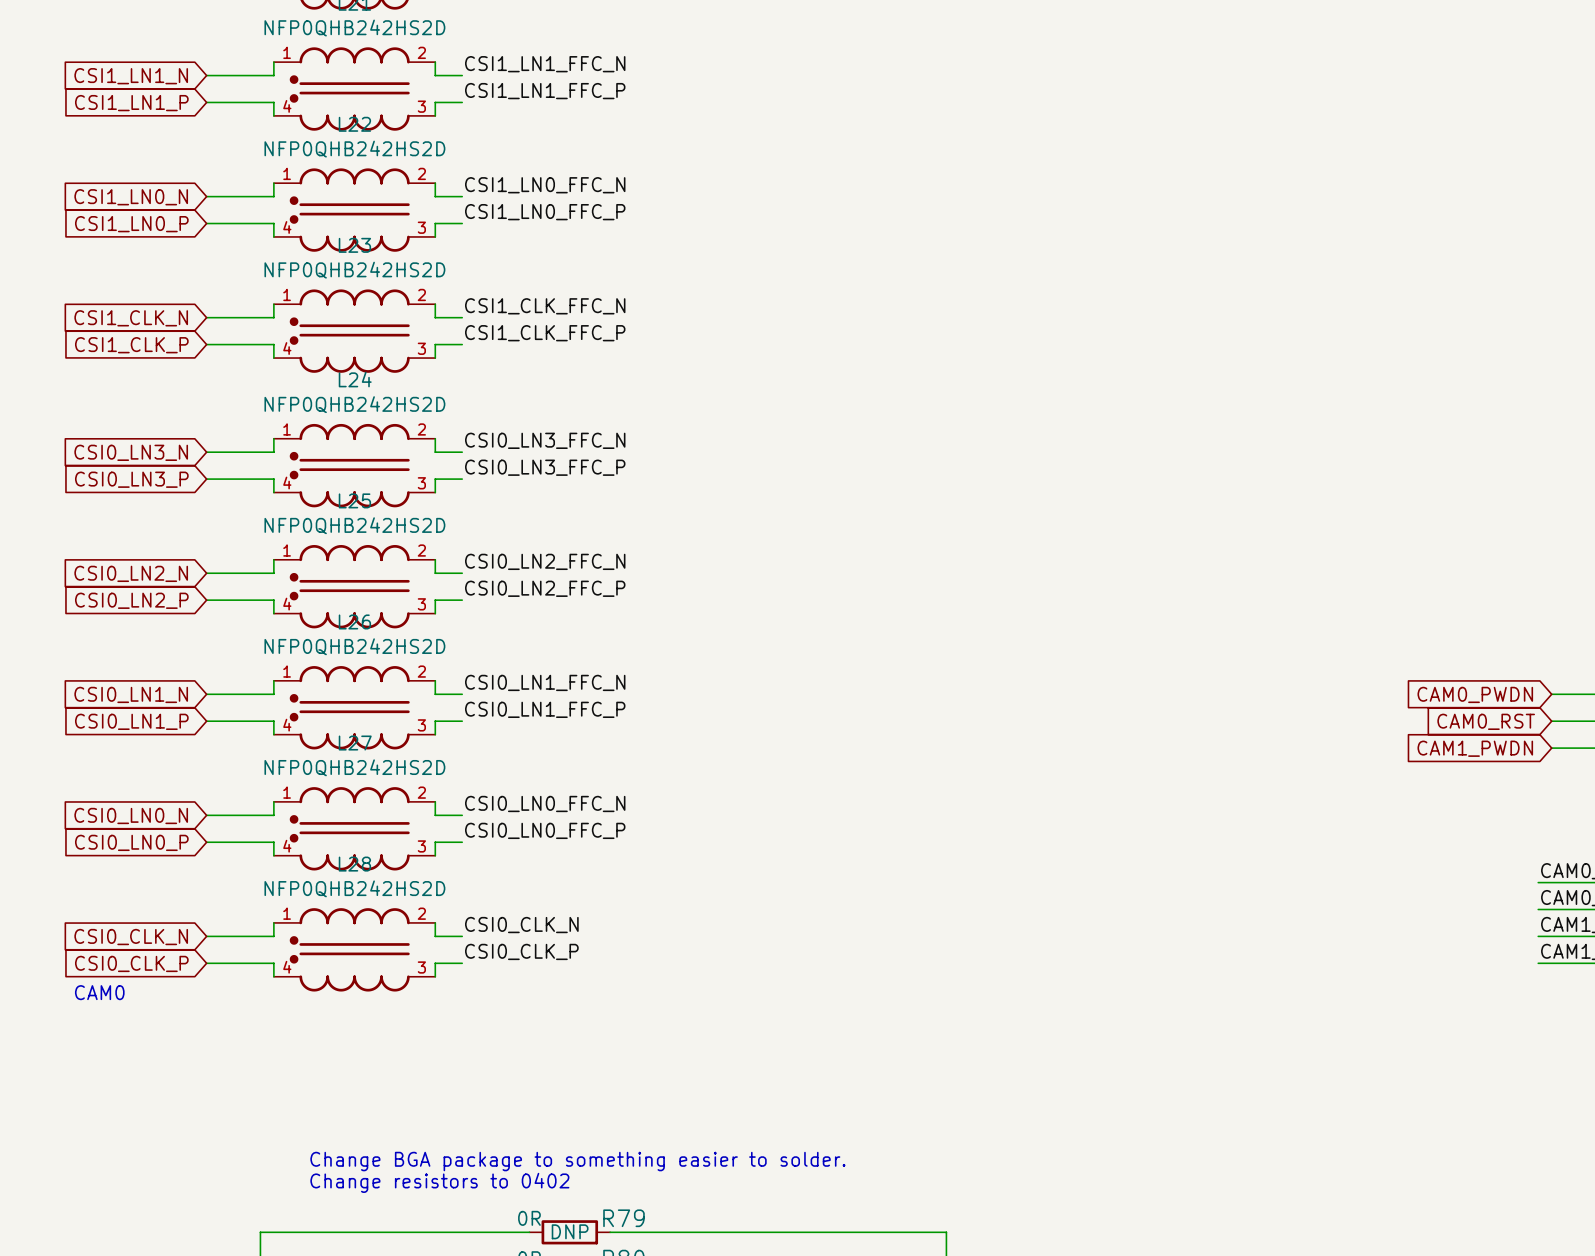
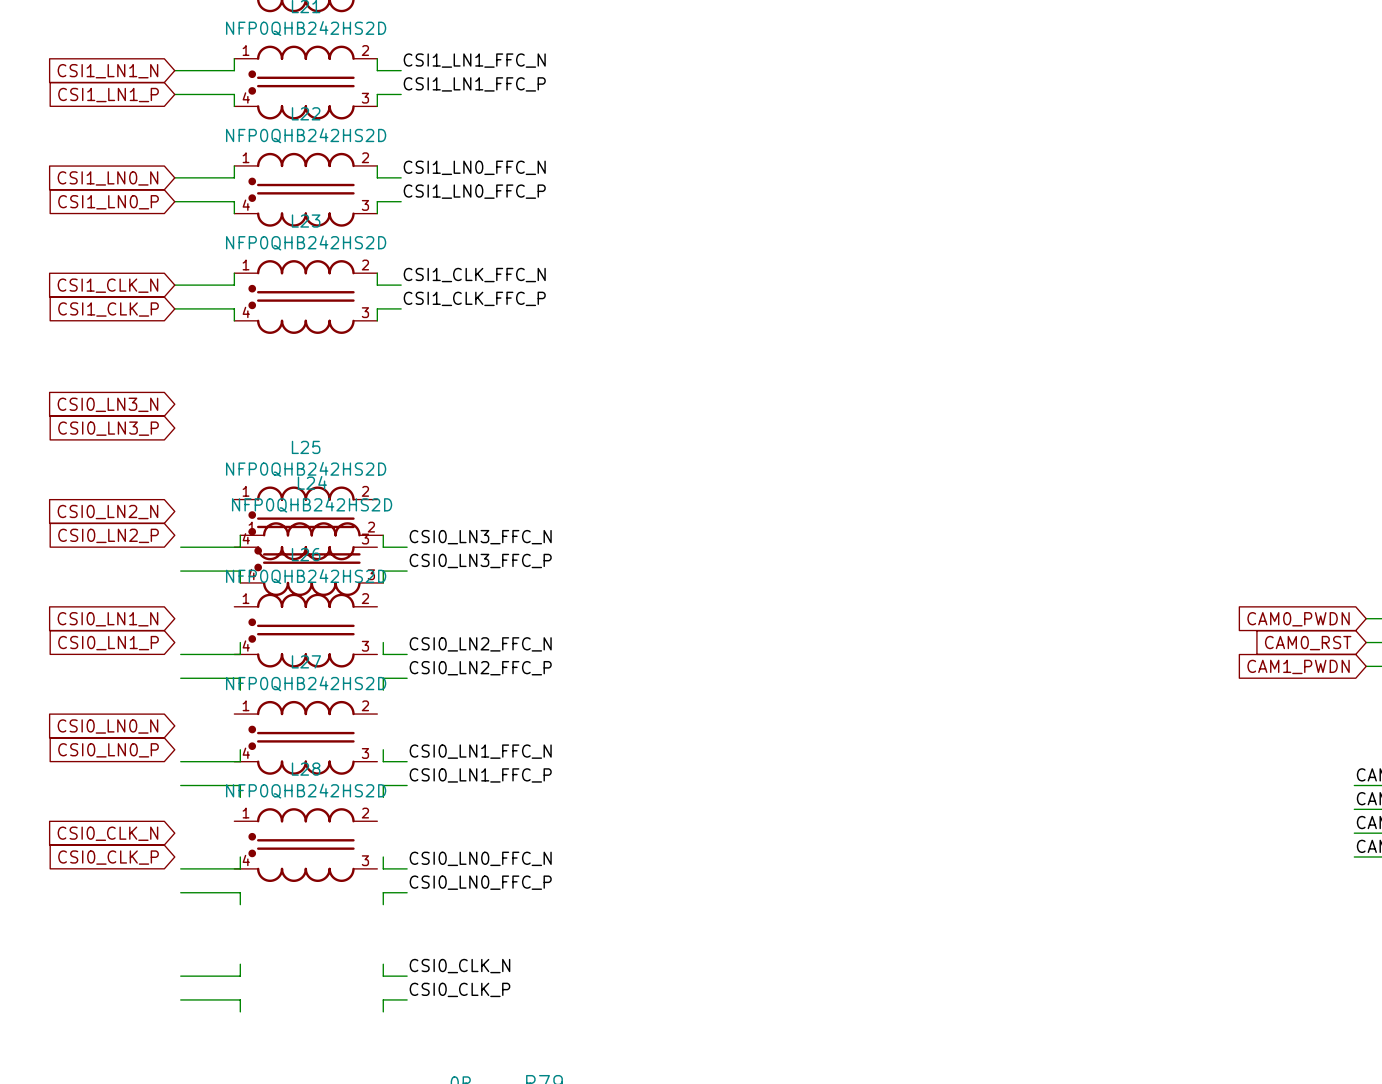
wire: (273, 438) (273, 452) (206, 452) -> (240, 535) (240, 547) (180, 547)
wire: (435, 438) (435, 452) (462, 452) -> (383, 535) (383, 547) (407, 547)
label position: CSI0_LN3_FFC_N (545, 440) -> CSI0_LN3_FFC_N (480, 537)
L24 position: (354, 465) -> (311, 559)
label position: CSI0_LN3_FFC_P (545, 467) -> CSI0_LN3_FFC_P (480, 560)
wire: (206, 479) (273, 479) (273, 492) -> (180, 571) (240, 571) (240, 582)
wire: (462, 479) (435, 479) (435, 492) -> (407, 571) (383, 571) (383, 582)
wire: (273, 559) (273, 573) (206, 573) -> (240, 642) (240, 654) (180, 654)
wire: (435, 559) (435, 573) (462, 573) -> (383, 642) (383, 654) (407, 654)
label position: CSI0_LN2_FFC_N (545, 561) -> CSI0_LN2_FFC_N (480, 644)
label position: CSI0_LN2_FFC_P (545, 588) -> CSI0_LN2_FFC_P (480, 668)
wire: (206, 600) (273, 600) (273, 613) -> (180, 678) (240, 678) (240, 690)
wire: (462, 600) (435, 600) (435, 613) -> (407, 678) (383, 678) (383, 690)
wire: (273, 680) (273, 694) (206, 694) -> (240, 749) (240, 761) (180, 761)
wire: (435, 680) (435, 694) (462, 694) -> (383, 749) (383, 761) (407, 761)
label position: CSI0_LN1_FFC_N (545, 682) -> CSI0_LN1_FFC_N (480, 751)
label position: CSI0_LN1_FFC_P (545, 709) -> CSI0_LN1_FFC_P (480, 775)
wire: (206, 721) (273, 721) (273, 734) -> (180, 785) (240, 785) (240, 797)
wire: (462, 721) (435, 721) (435, 734) -> (407, 785) (383, 785) (383, 797)
wire: (273, 801) (273, 815) (206, 815) -> (240, 856) (240, 868) (180, 868)
wire: (435, 801) (435, 815) (462, 815) -> (383, 856) (383, 868) (407, 868)
label position: CSI0_LN0_FFC_N (545, 803) -> CSI0_LN0_FFC_N (480, 858)
label position: CSI0_LN0_FFC_P (545, 830) -> CSI0_LN0_FFC_P (480, 882)
wire: (206, 842) (273, 842) (273, 855) -> (180, 892) (240, 892) (240, 904)
wire: (462, 842) (435, 842) (435, 855) -> (407, 892) (383, 892) (383, 904)
wire: (273, 922) (273, 936) (206, 936) -> (240, 964) (240, 976) (180, 976)
wire: (435, 922) (435, 936) (462, 936) -> (383, 964) (383, 976) (407, 976)
label position: CSI0_CLK_N (521, 925) -> CSI0_CLK_N (459, 966)
label position: CSI0_CLK_P (521, 951) -> CSI0_CLK_P (459, 989)
wire: (206, 963) (273, 963) (273, 976) -> (180, 999) (240, 999) (240, 1011)
wire: (462, 963) (435, 963) (435, 976) -> (407, 999) (383, 999) (383, 1011)
text: CAM0 (99, 992) -> none
text: Change BGA package to something easier to solder. (577, 1161) -> none
text: Change resistors to 0402 (439, 1182) -> none

